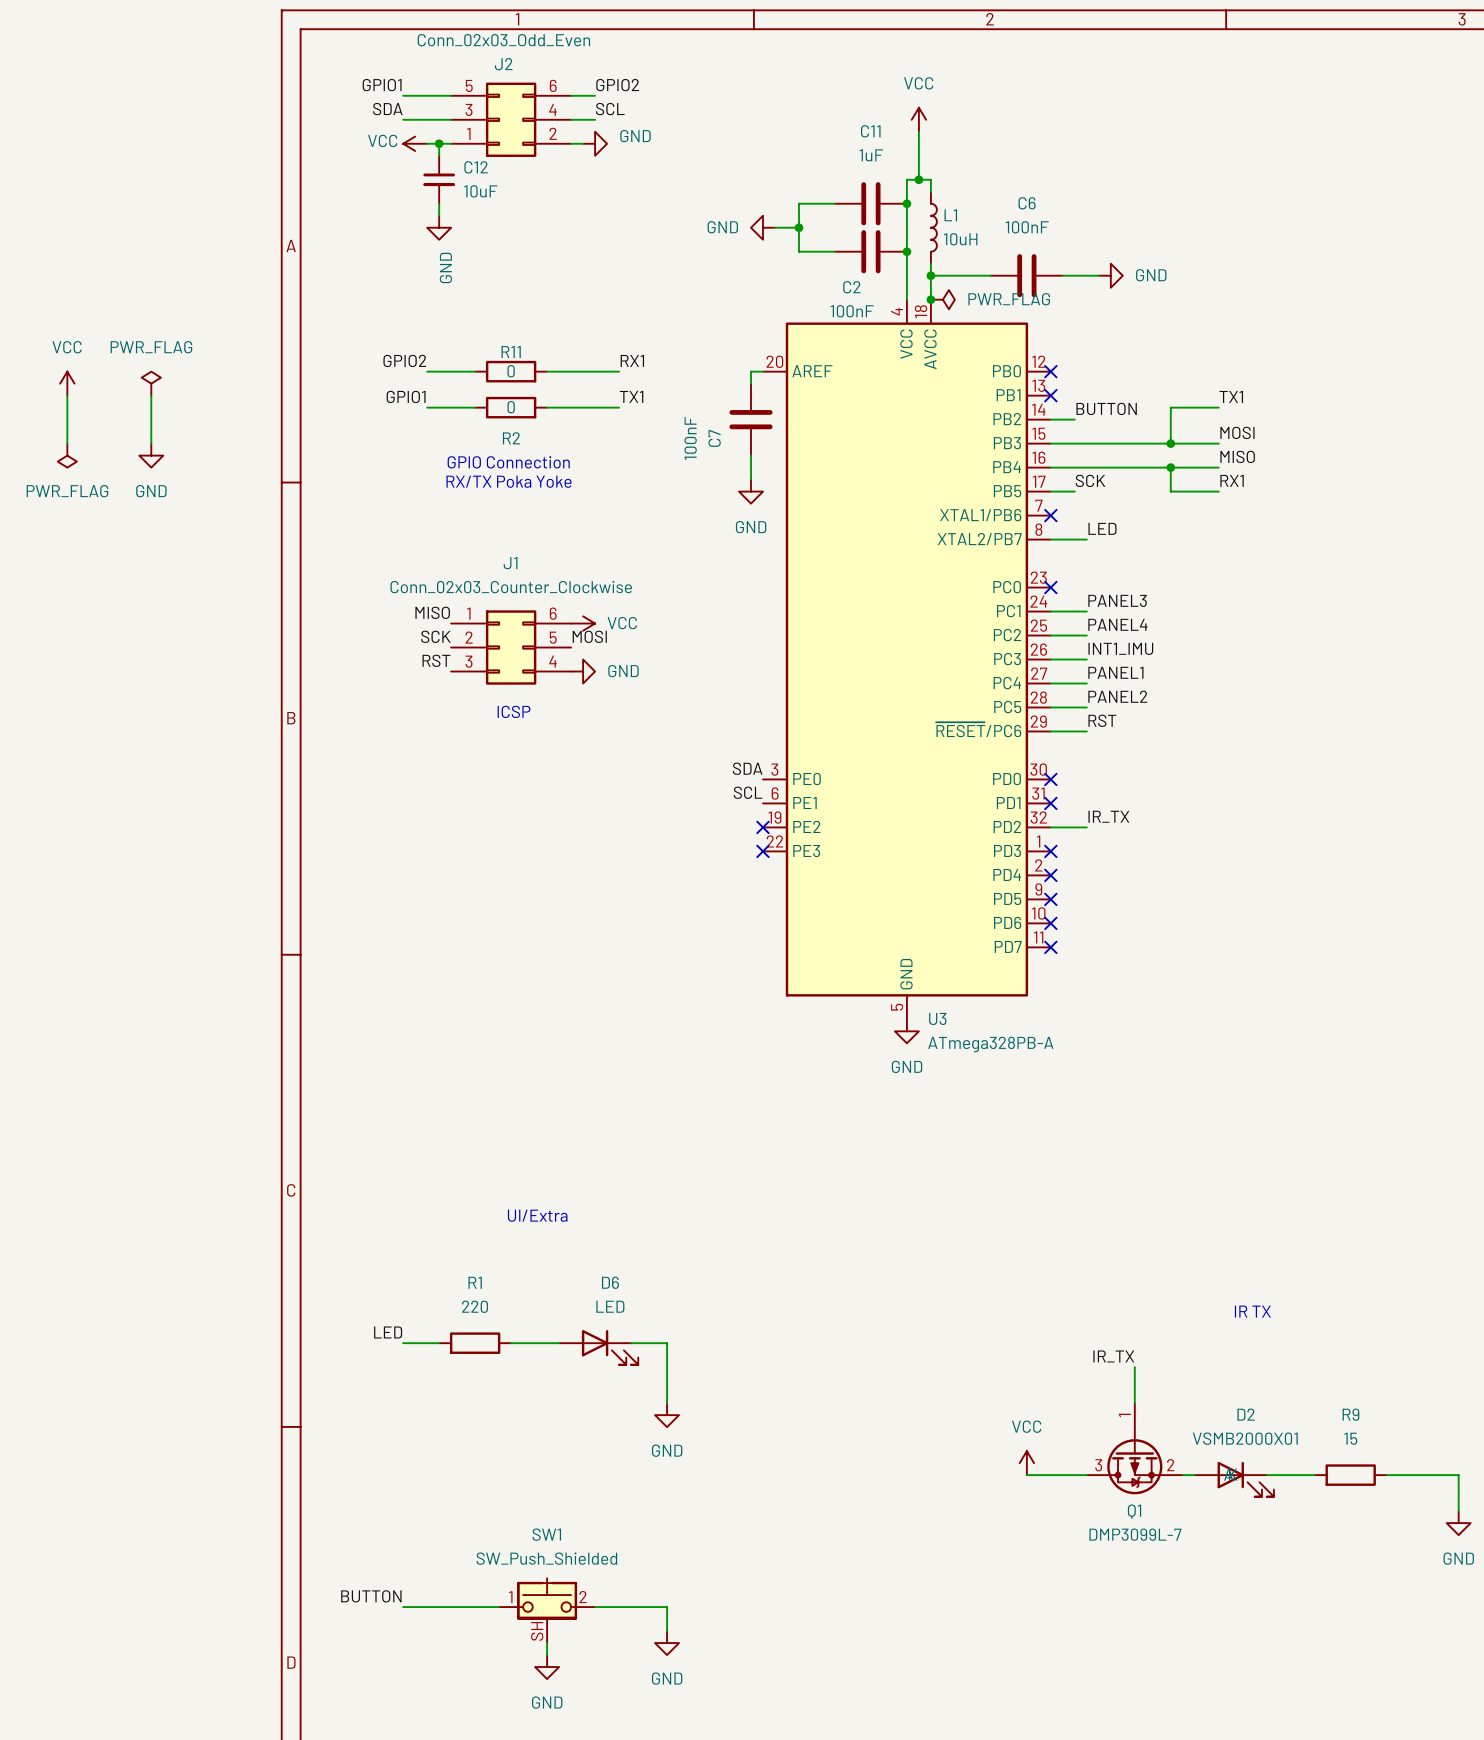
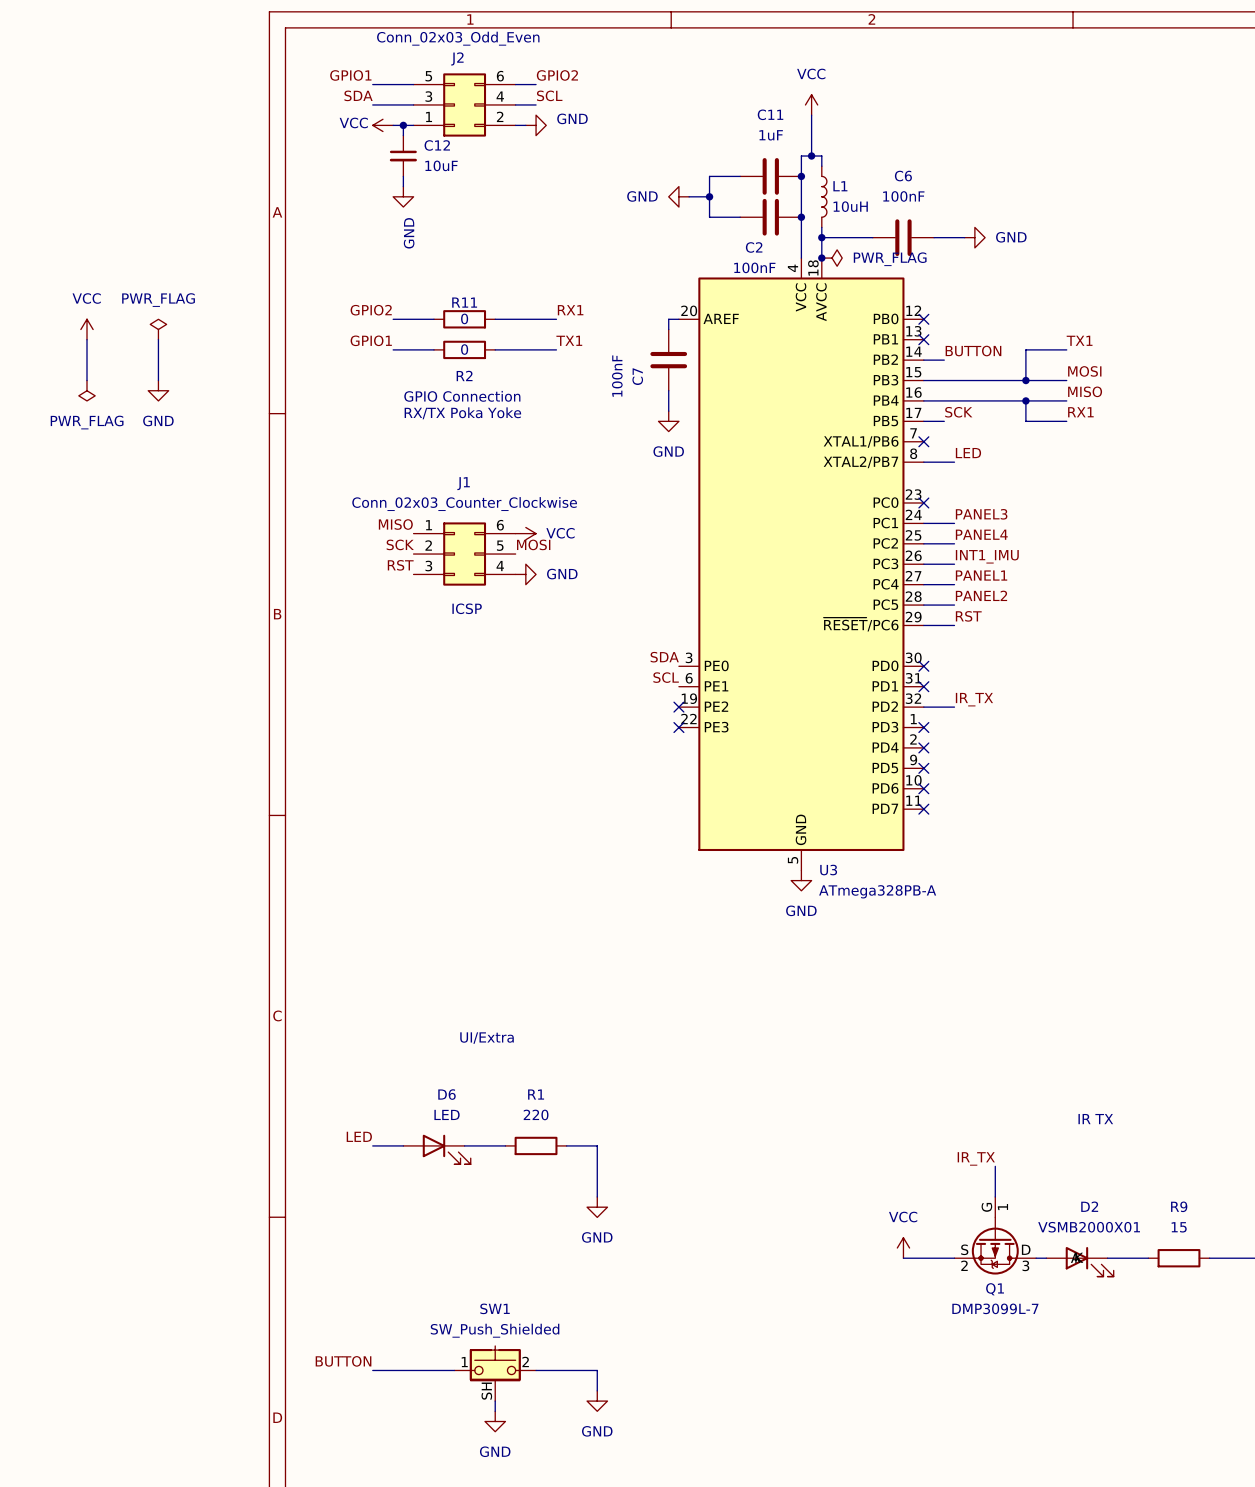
R1 position: (475, 1343) -> (536, 1145)
D6 position: (598, 1347) -> (437, 1149)
Q1 symbol: [1086, 1403, 1183, 1495] -> [954, 1196, 1037, 1275]

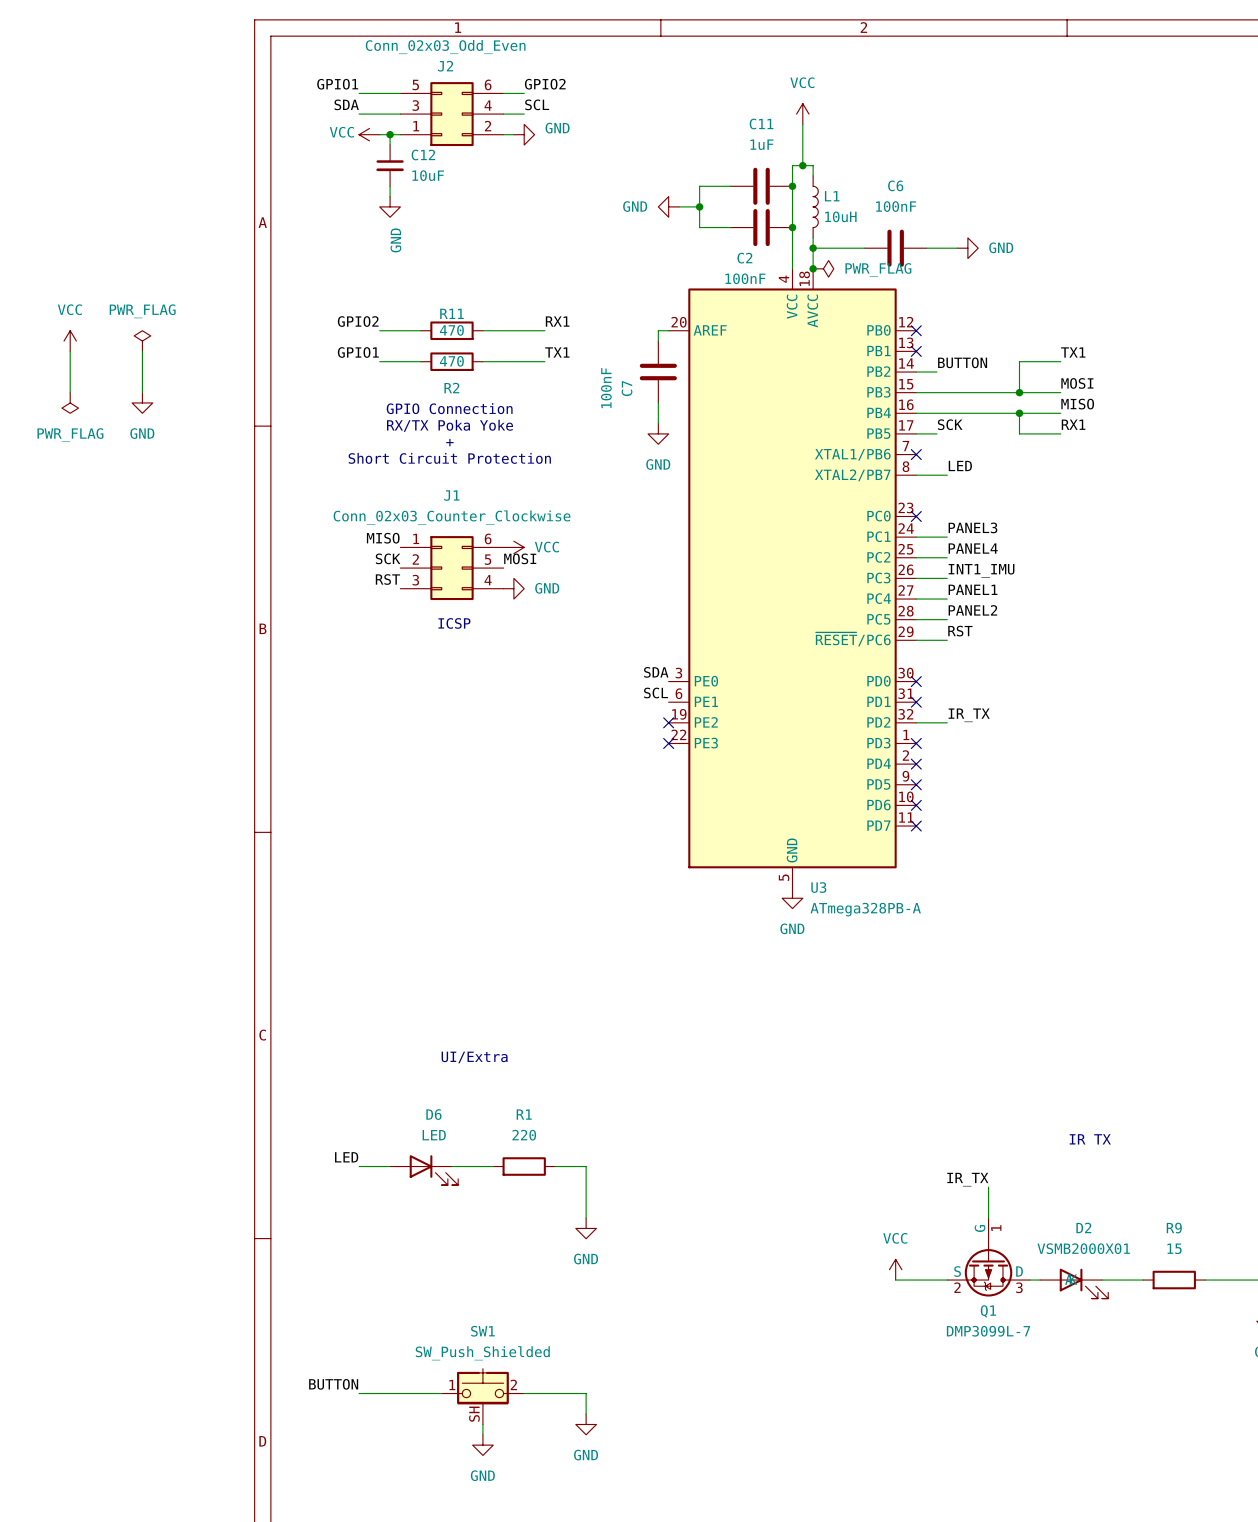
R11 value: 0 (464, 318) -> 470 (451, 330)
R2 value: 0 (464, 349) -> 470 (451, 361)
text: none -> + (449, 442)
text: none -> Short Circuit Protection (449, 458)

